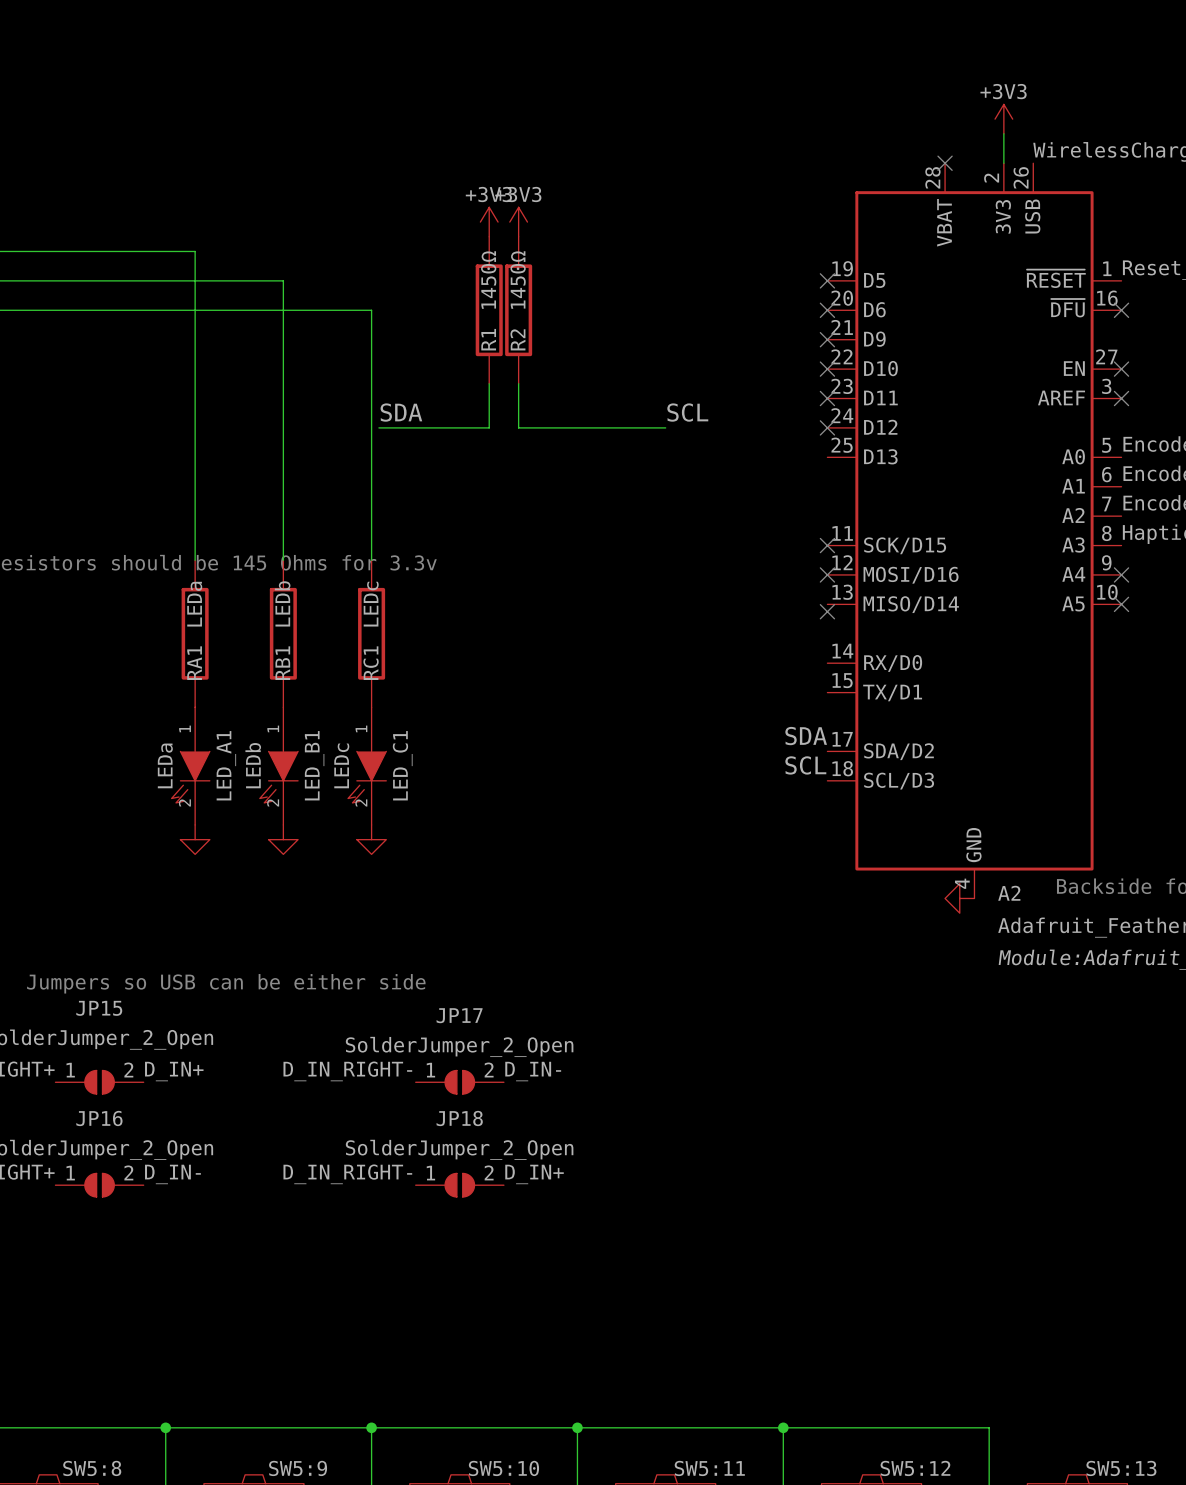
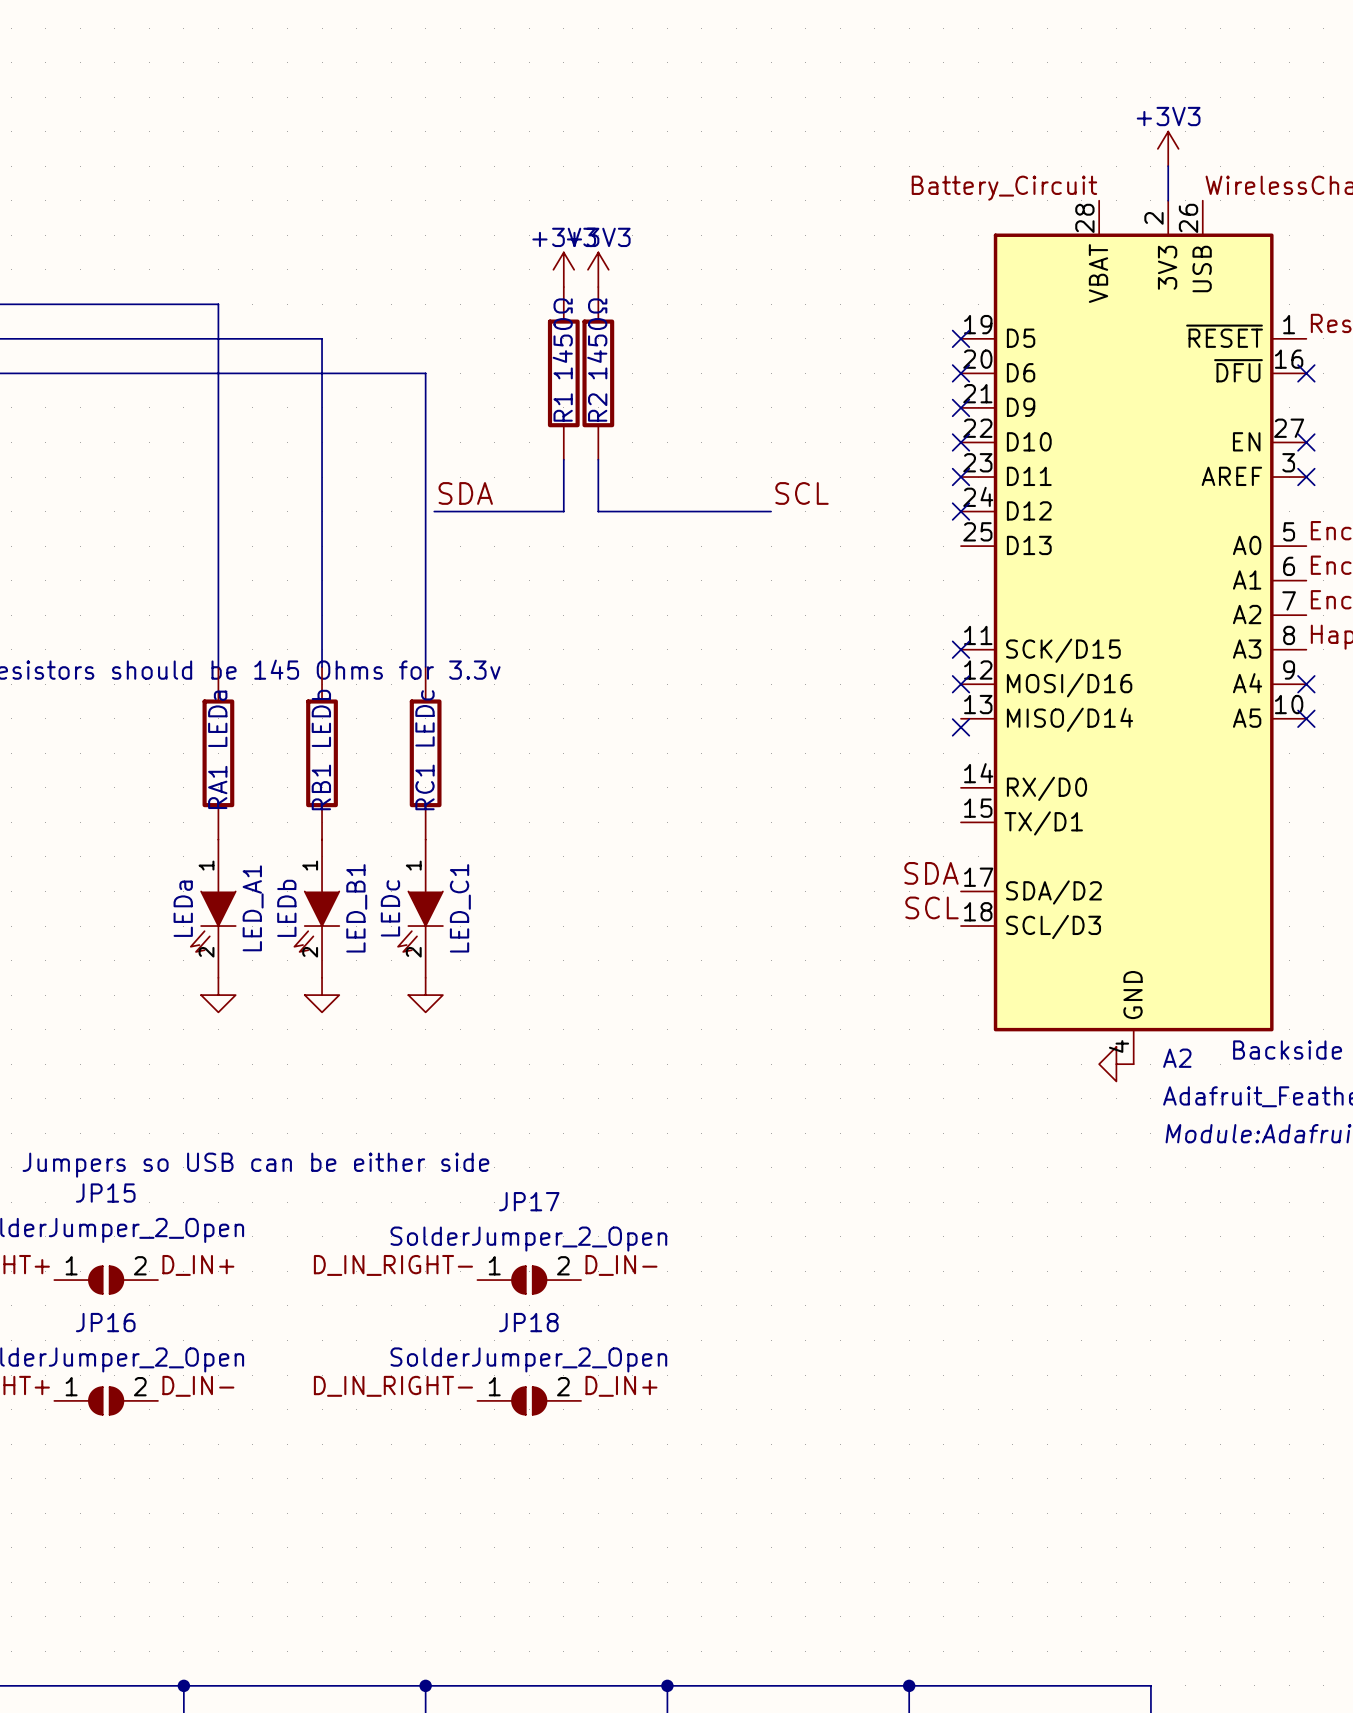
label: none -> Battery_Circuit (1004, 188)
no-connect mark: (945, 163) -> none

